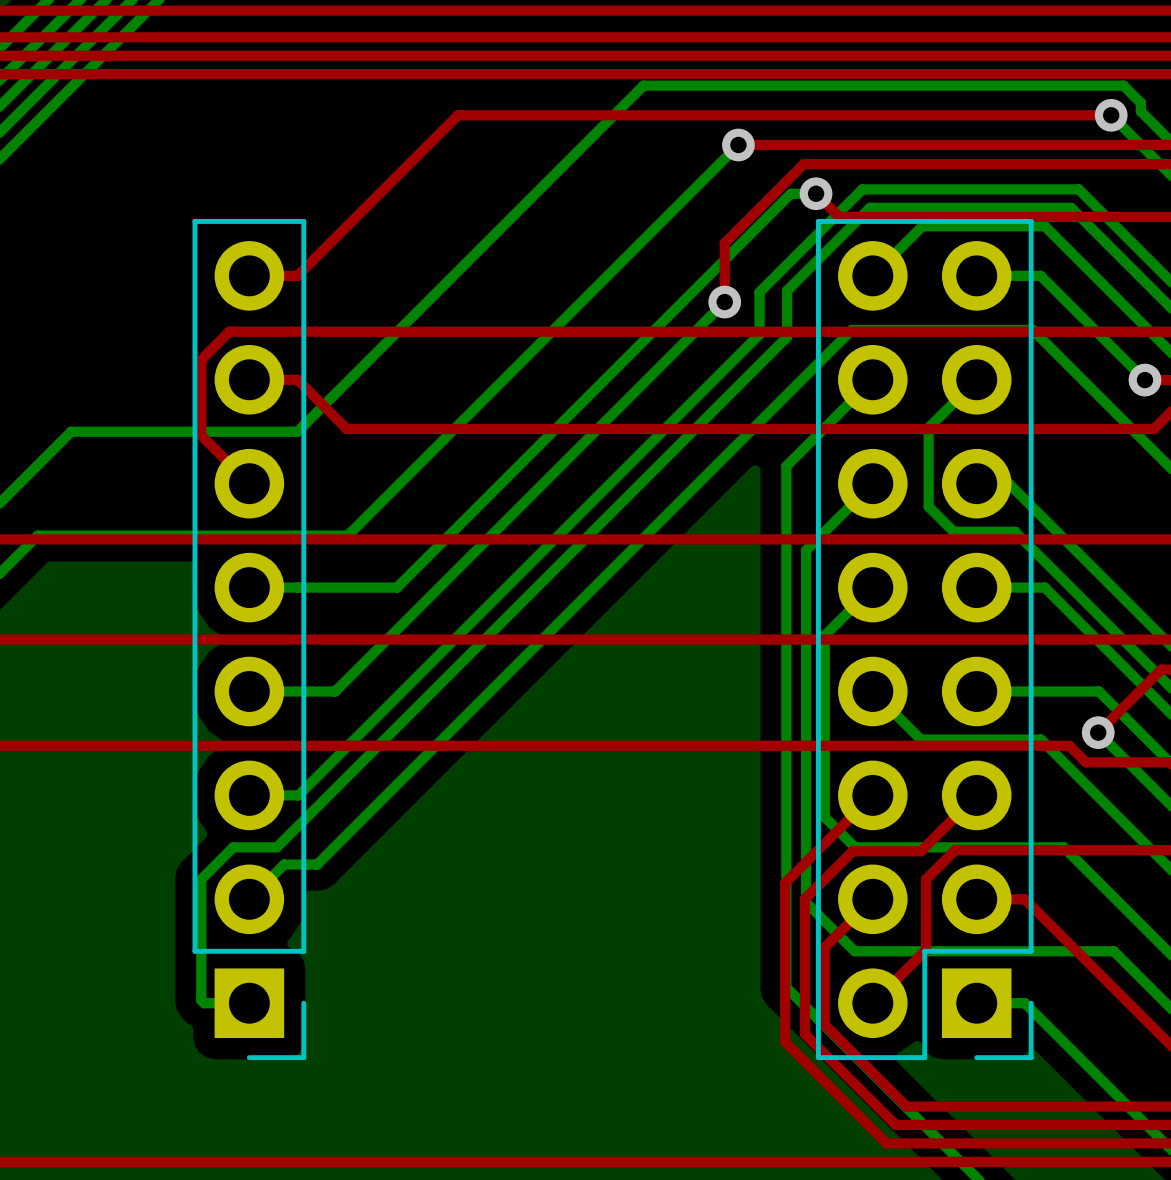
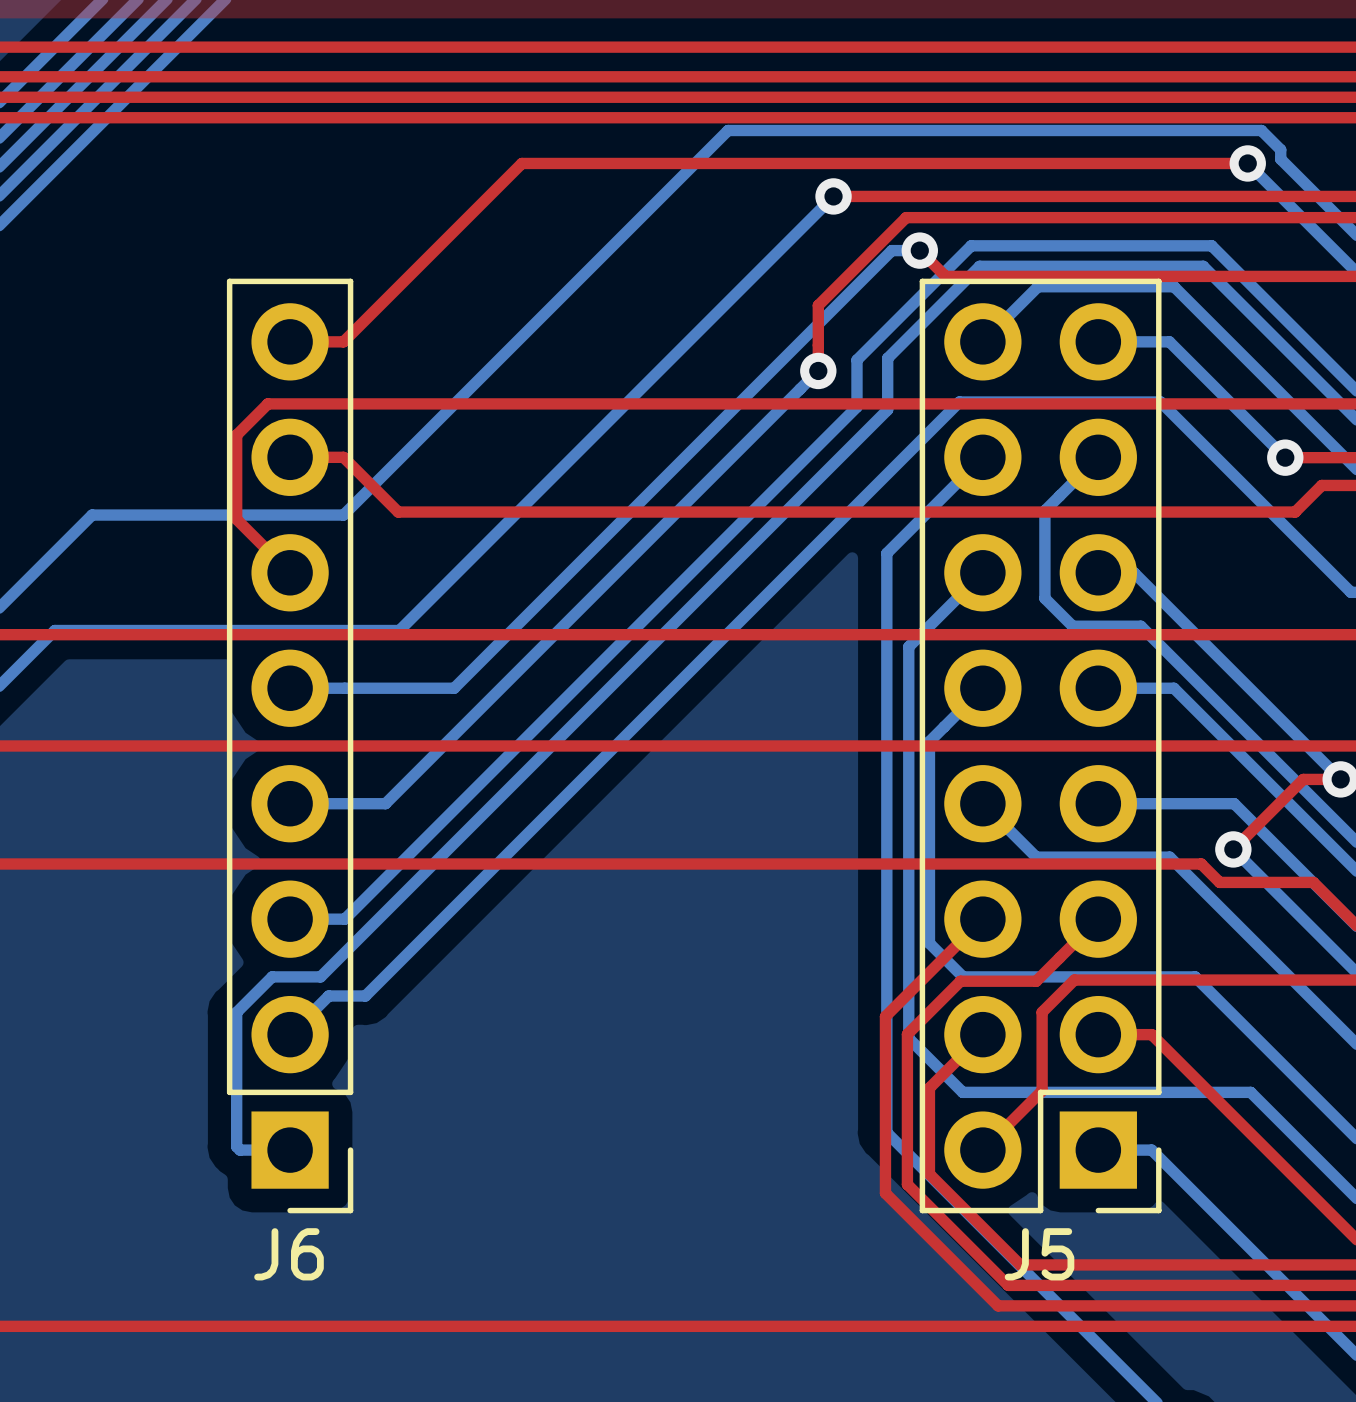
J6 name: none -> J6 (289, 1254)
J5 name: none -> J5 (1039, 1254)

